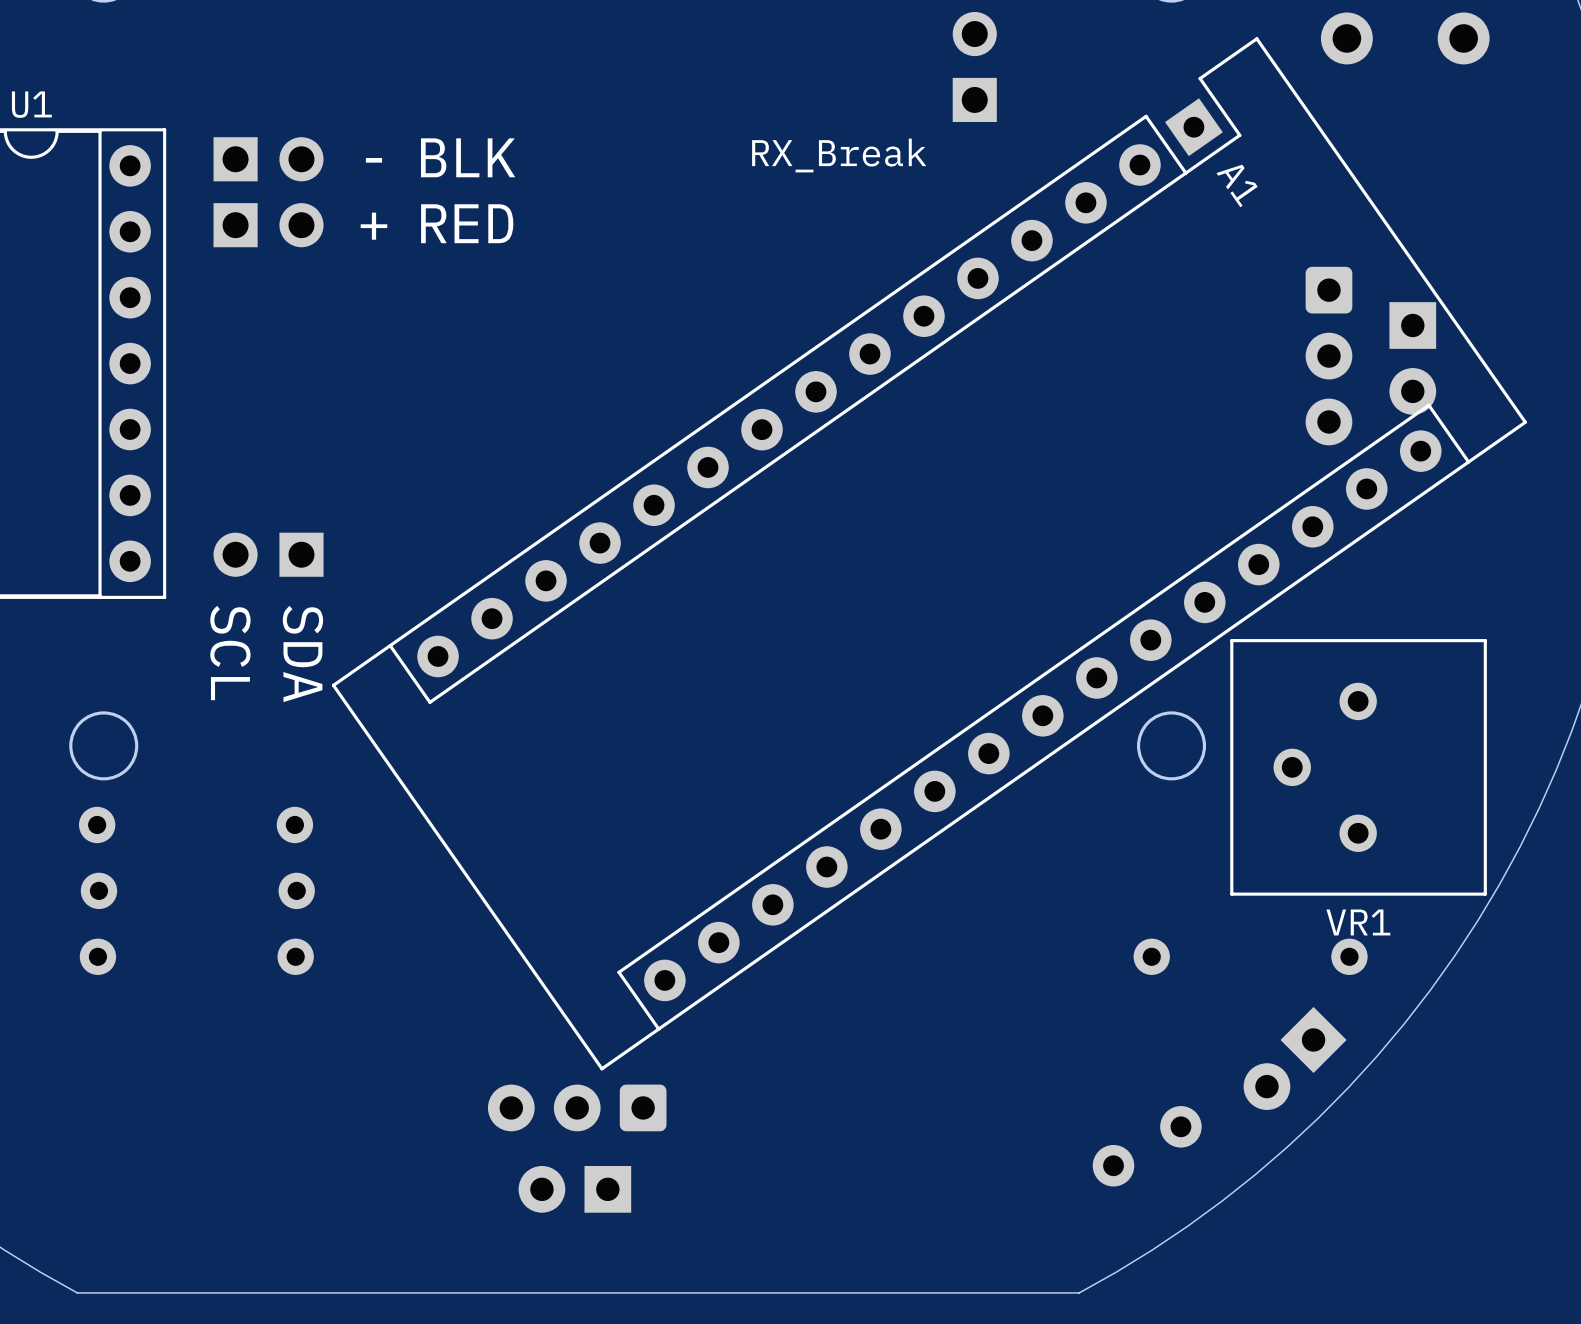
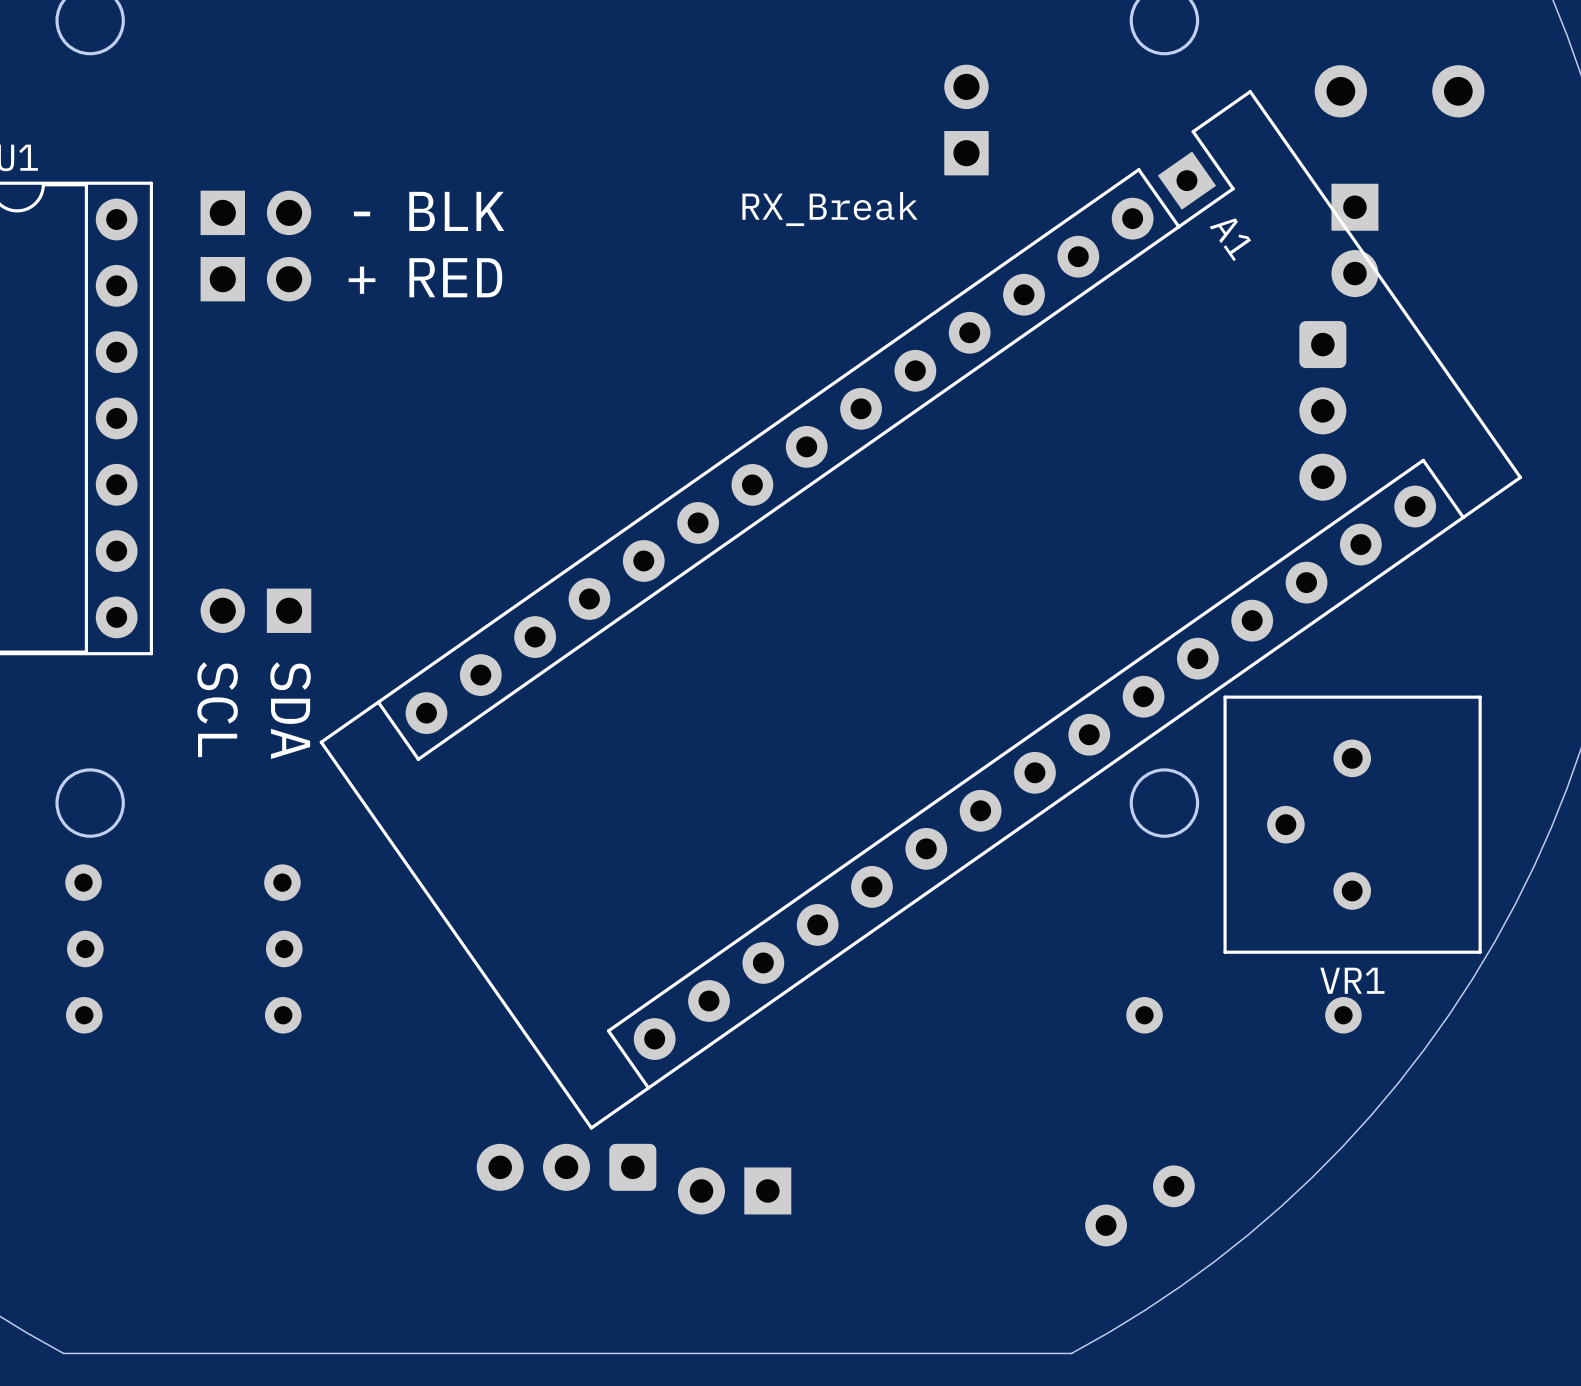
part position: (1412, 358) -> (1354, 240)
part: (1295, 1058) -> none
part position: (574, 1189) -> (734, 1190)

